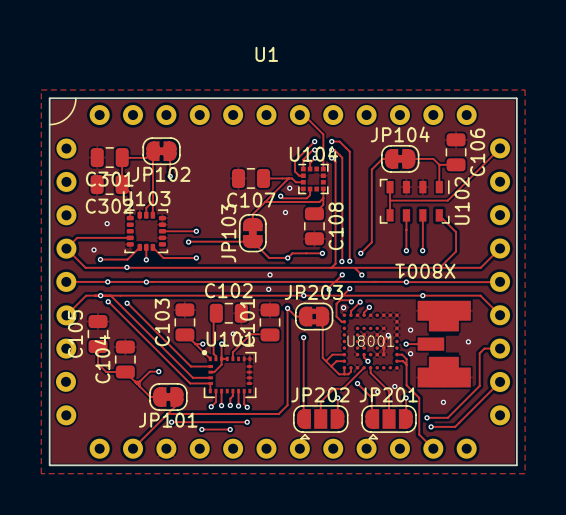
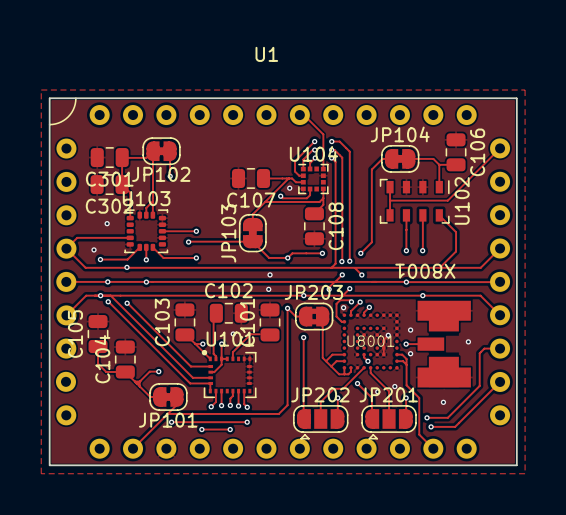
via: (285, 212) -> none

